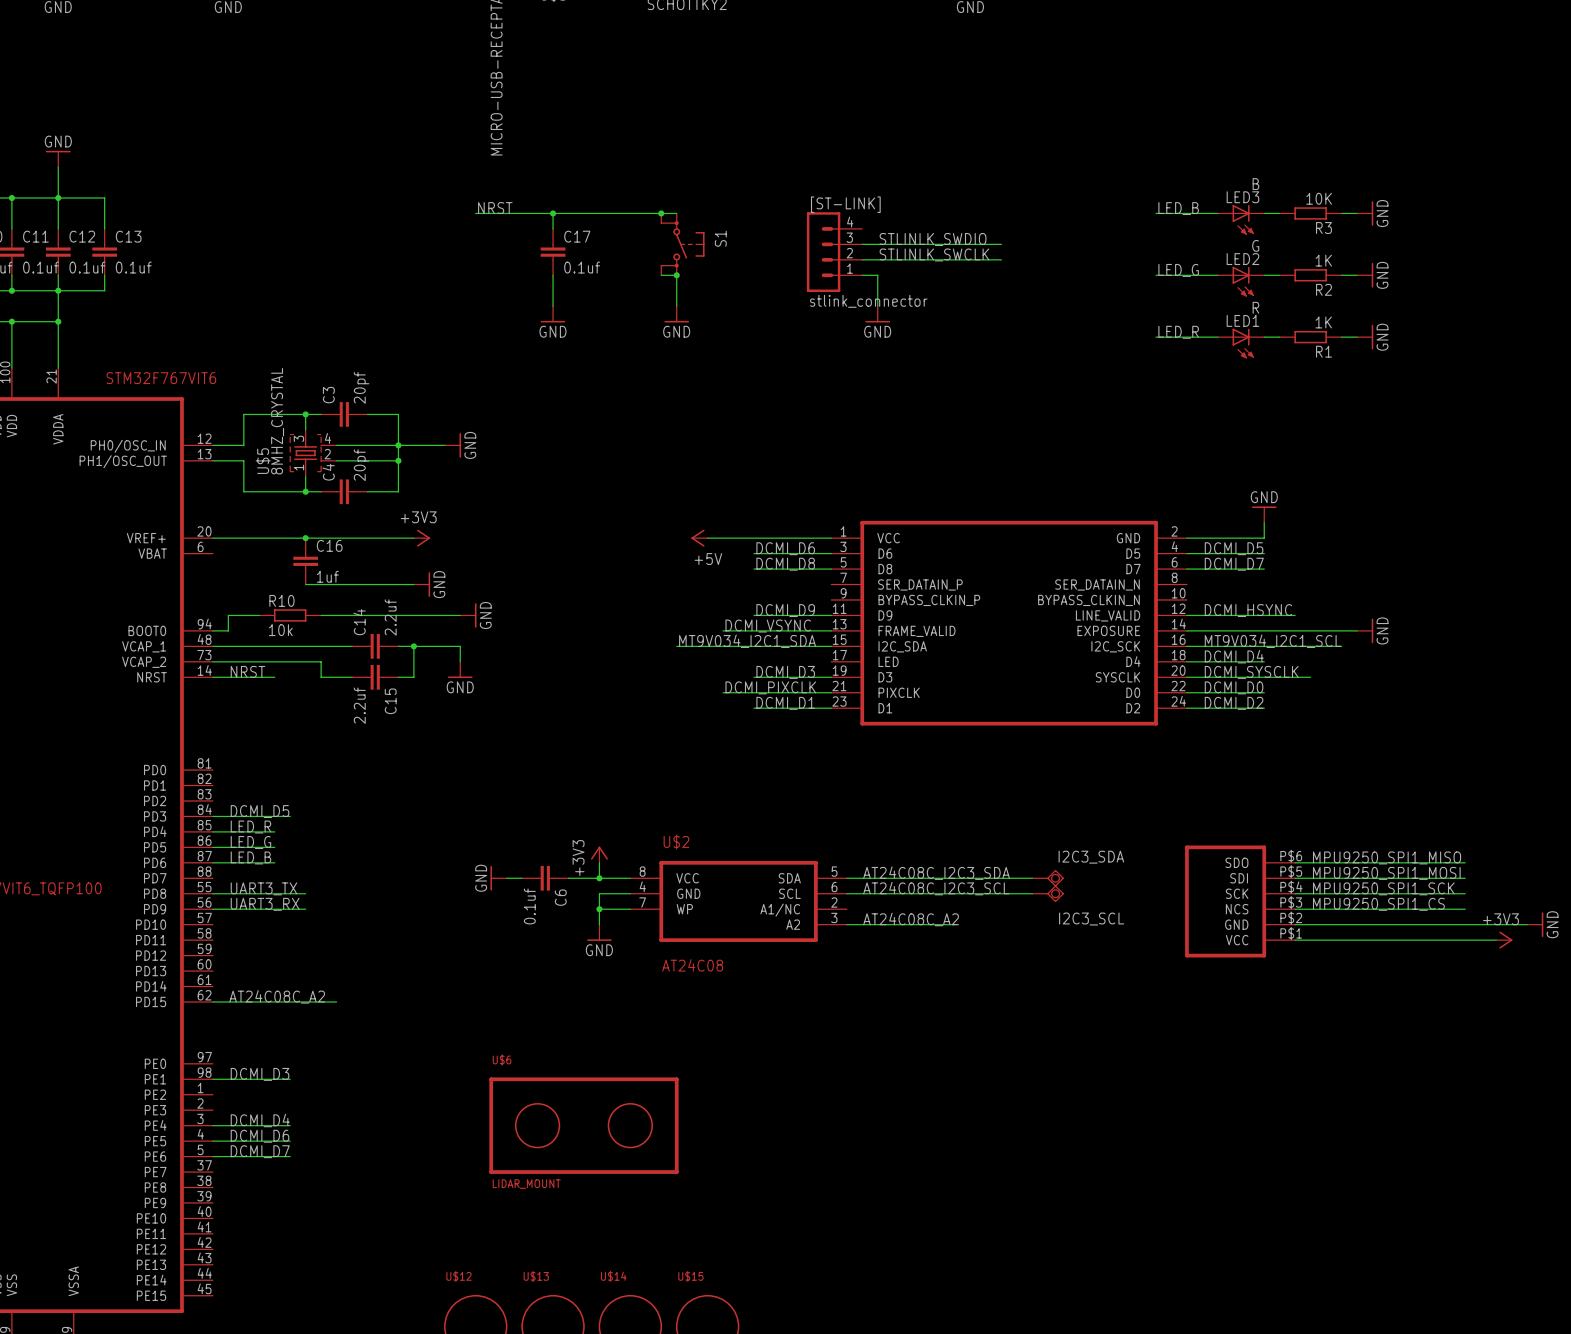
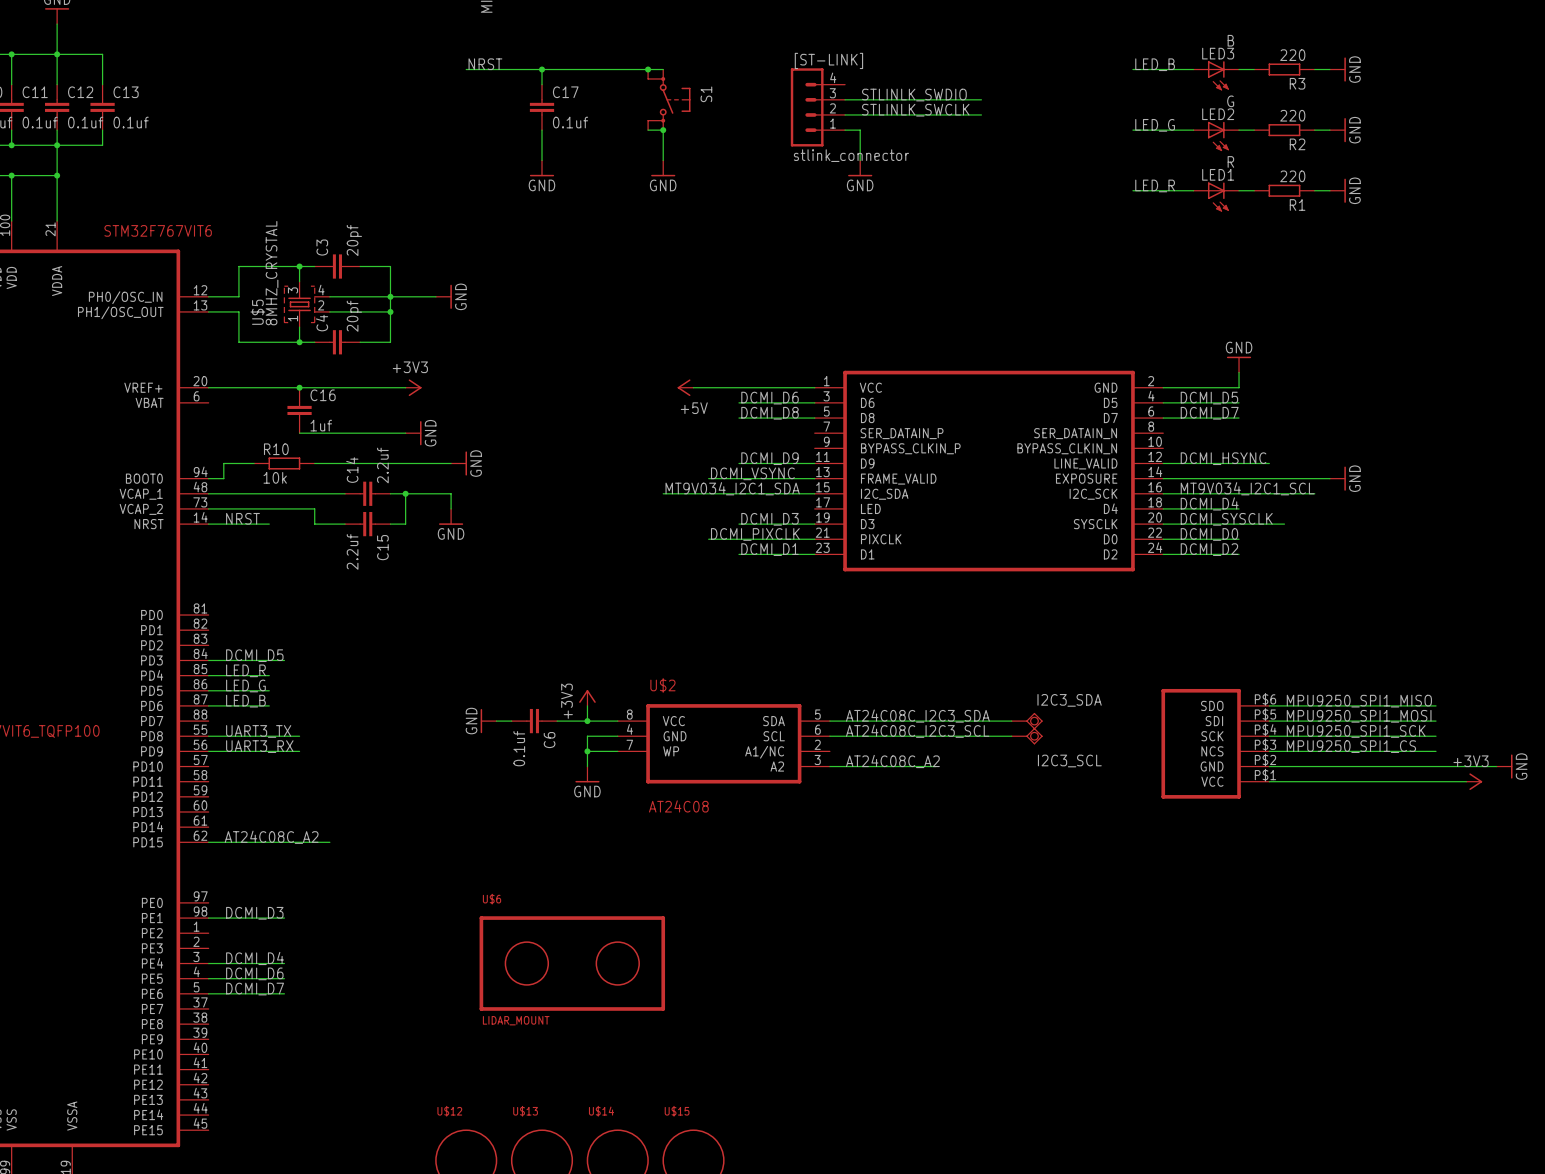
R3 value: 10K (1319, 198) -> 220 (1292, 55)
R2 value: 1K (1323, 260) -> 220 (1292, 115)
R1 value: 1K (1323, 322) -> 220 (1292, 176)

